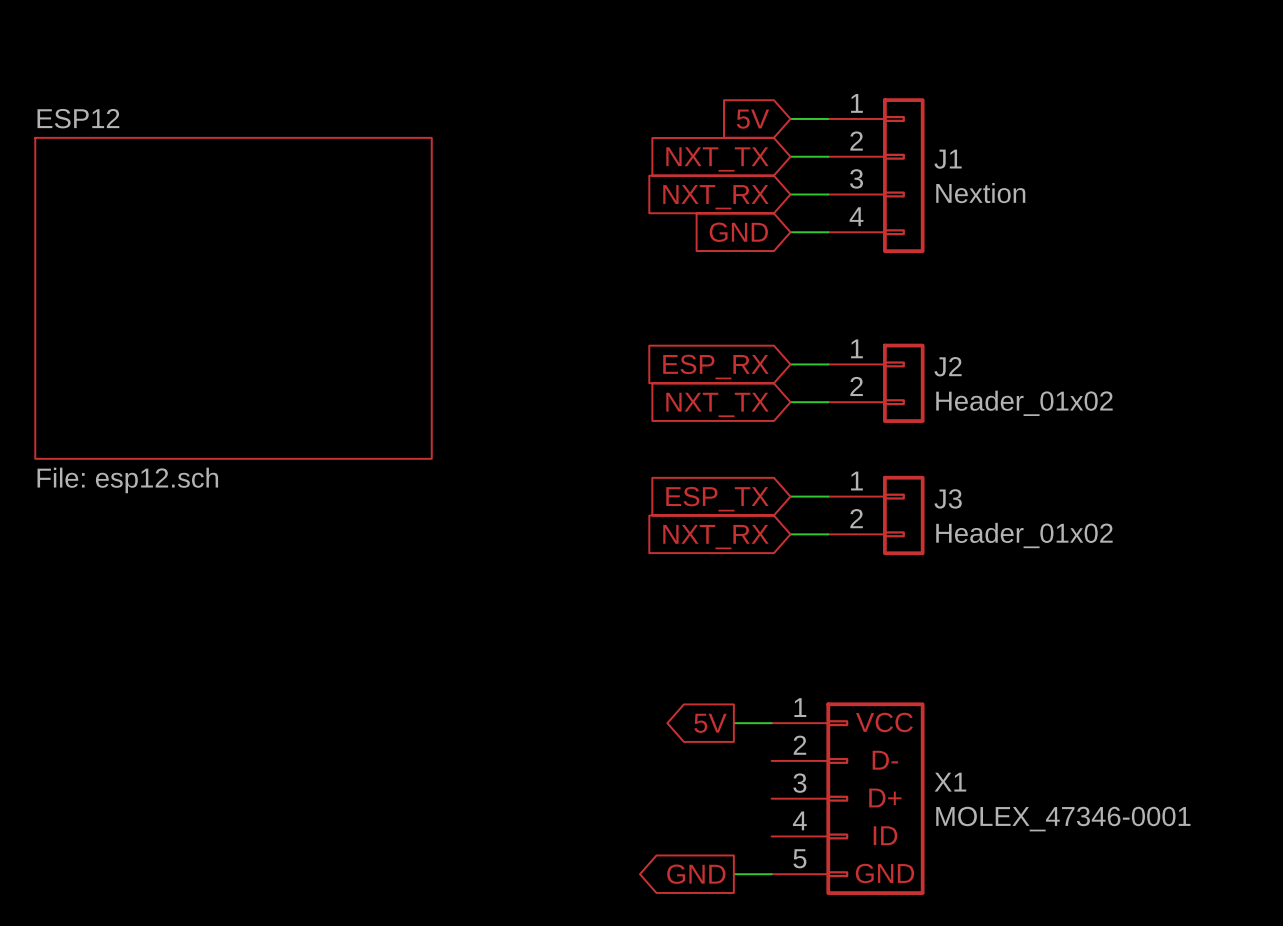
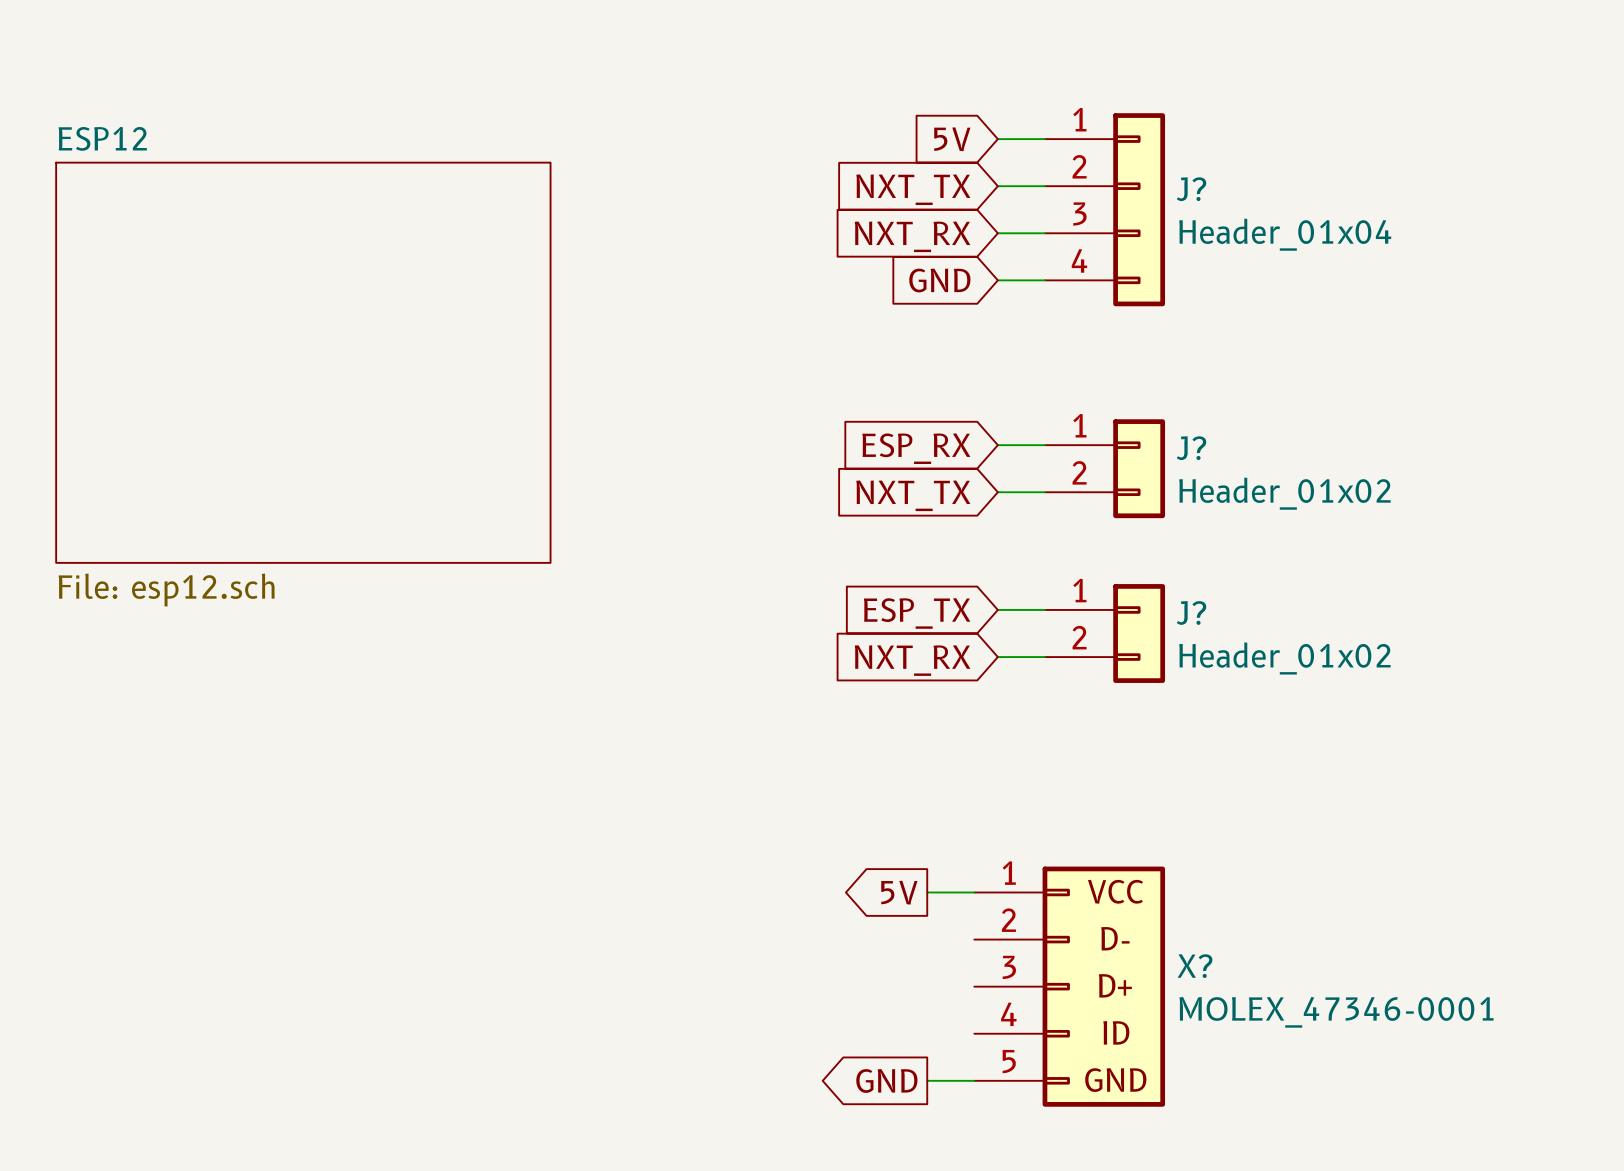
J1 name: J1 (948, 159) -> J? (1191, 189)
J1 value: Nextion (980, 193) -> Header_01x04 (1285, 234)
J2 name: J2 (948, 366) -> J? (1191, 448)
J3 name: J3 (948, 498) -> J? (1191, 612)
X1 name: X1 (950, 782) -> X? (1195, 966)

